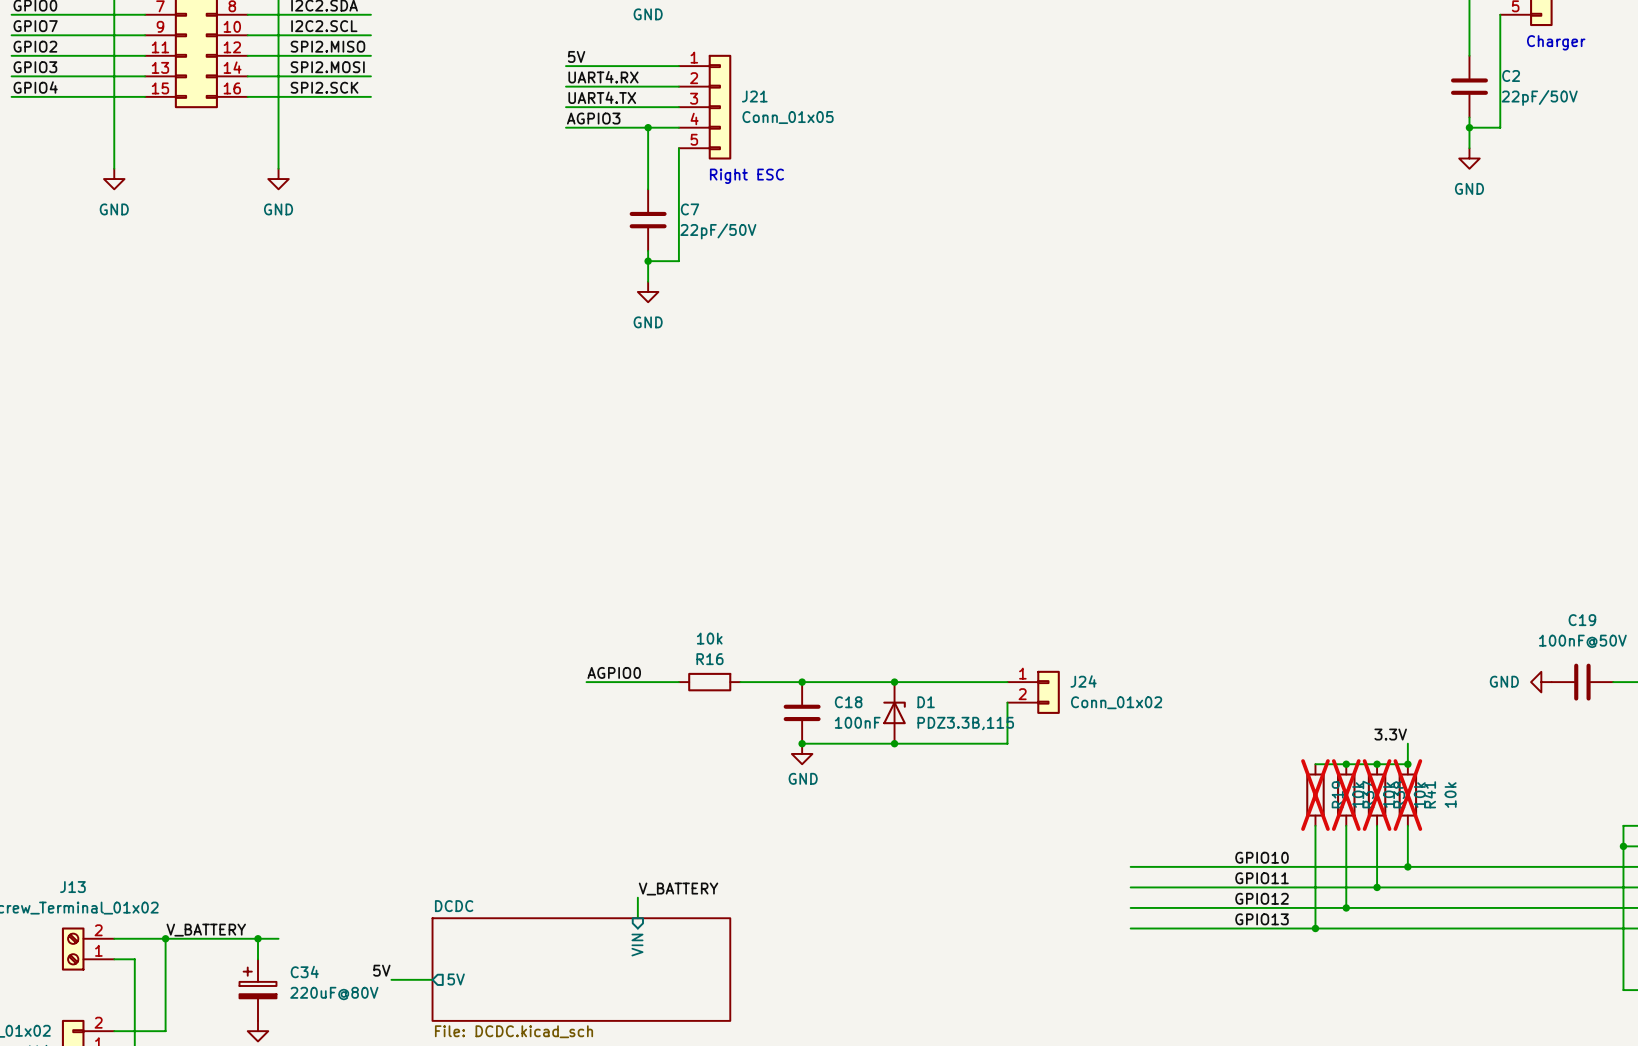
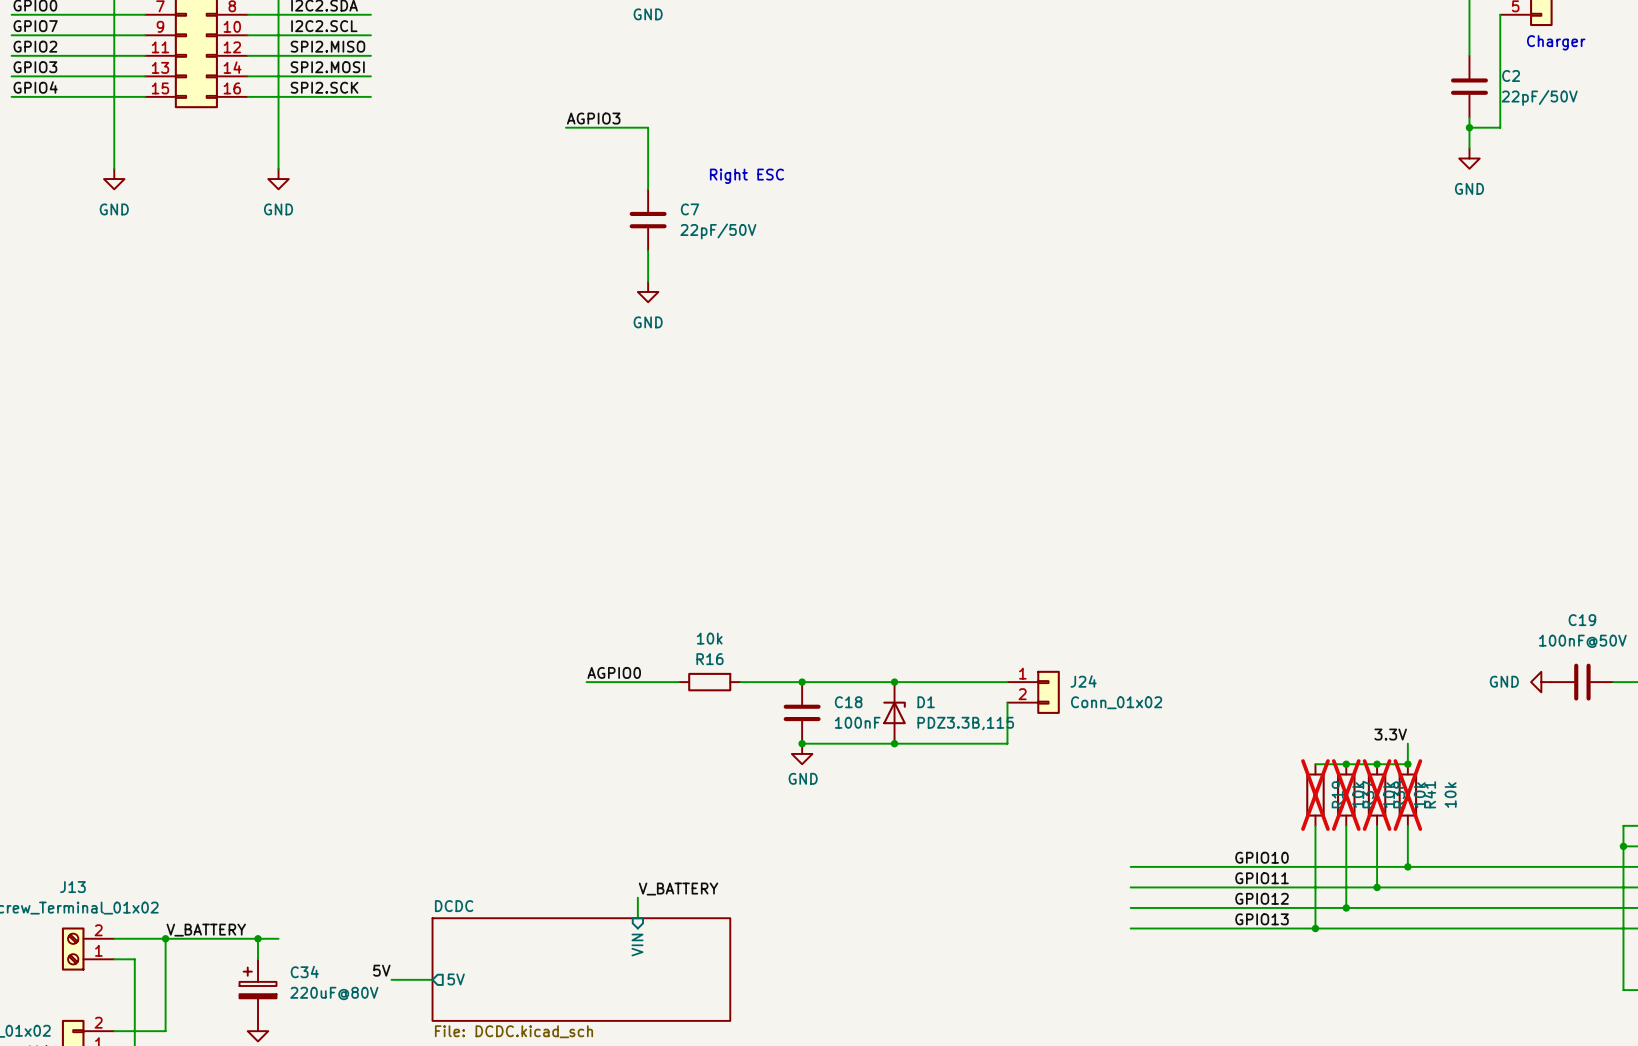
label: 5V (576, 56) -> none
wire: (566, 66) (678, 66) -> none
label: UART4.RX (603, 77) -> none
wire: (566, 86) (678, 86) -> none
label: UART4.TX (602, 97) -> none
wire: (566, 107) (678, 107) -> none
J21: Conn_01x05 (705, 107) -> none
wire: (648, 127) (678, 127) -> none
junction: (648, 127) -> none
wire: (678, 148) (678, 261) (648, 261) -> none
junction: (648, 261) -> none

